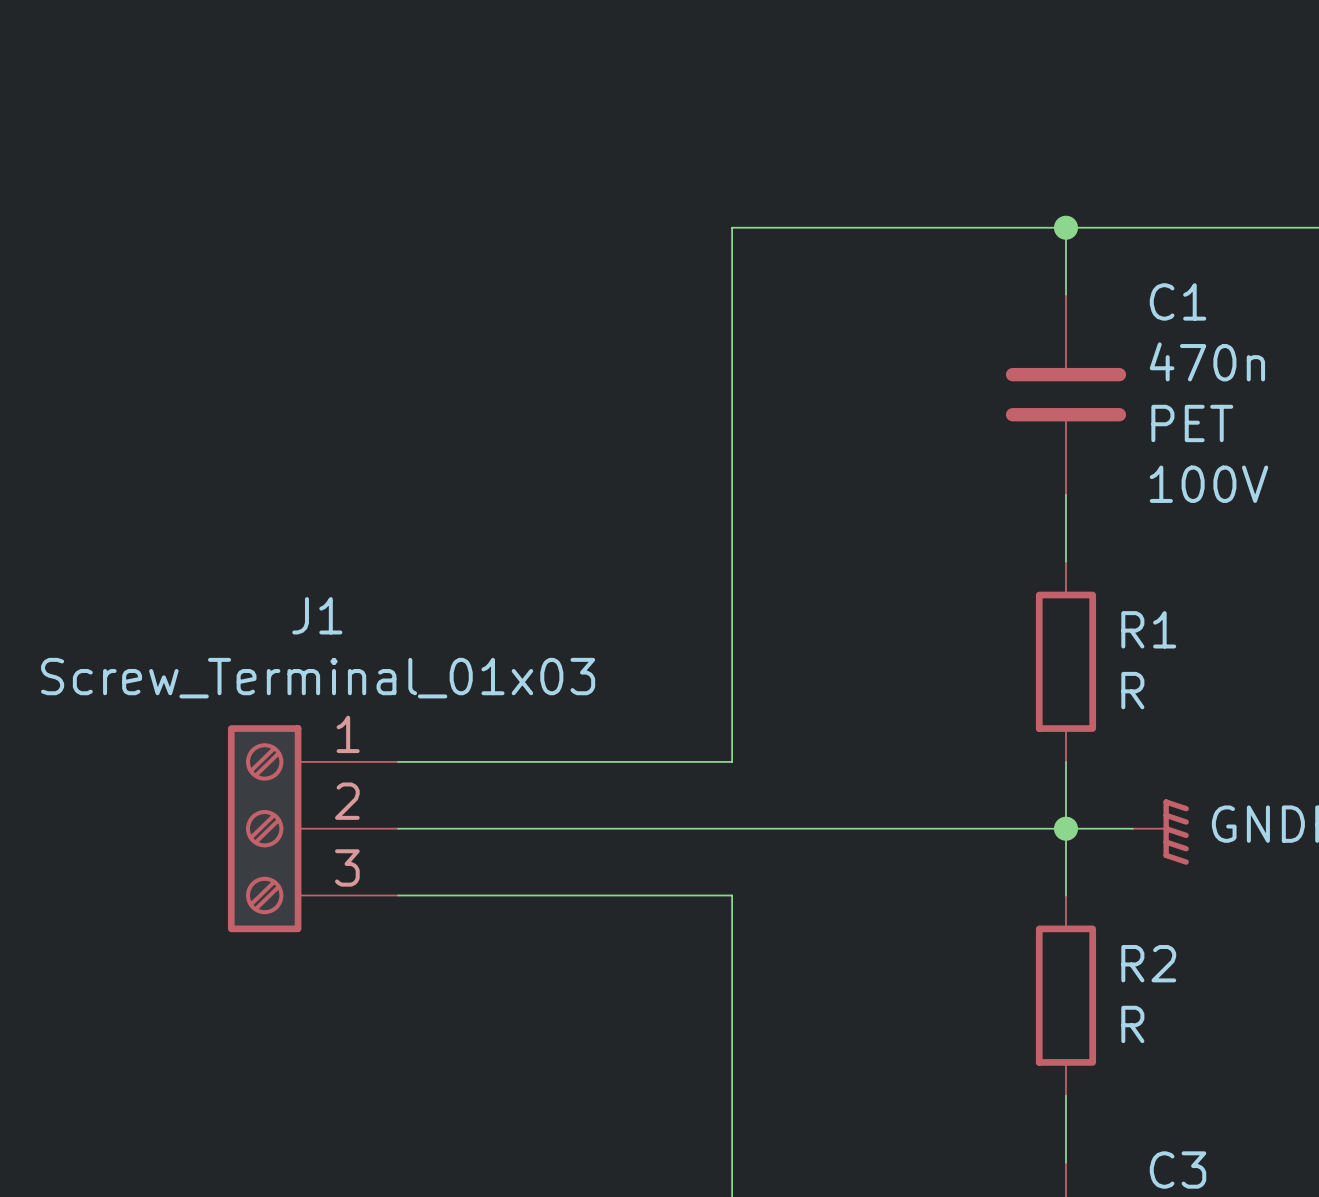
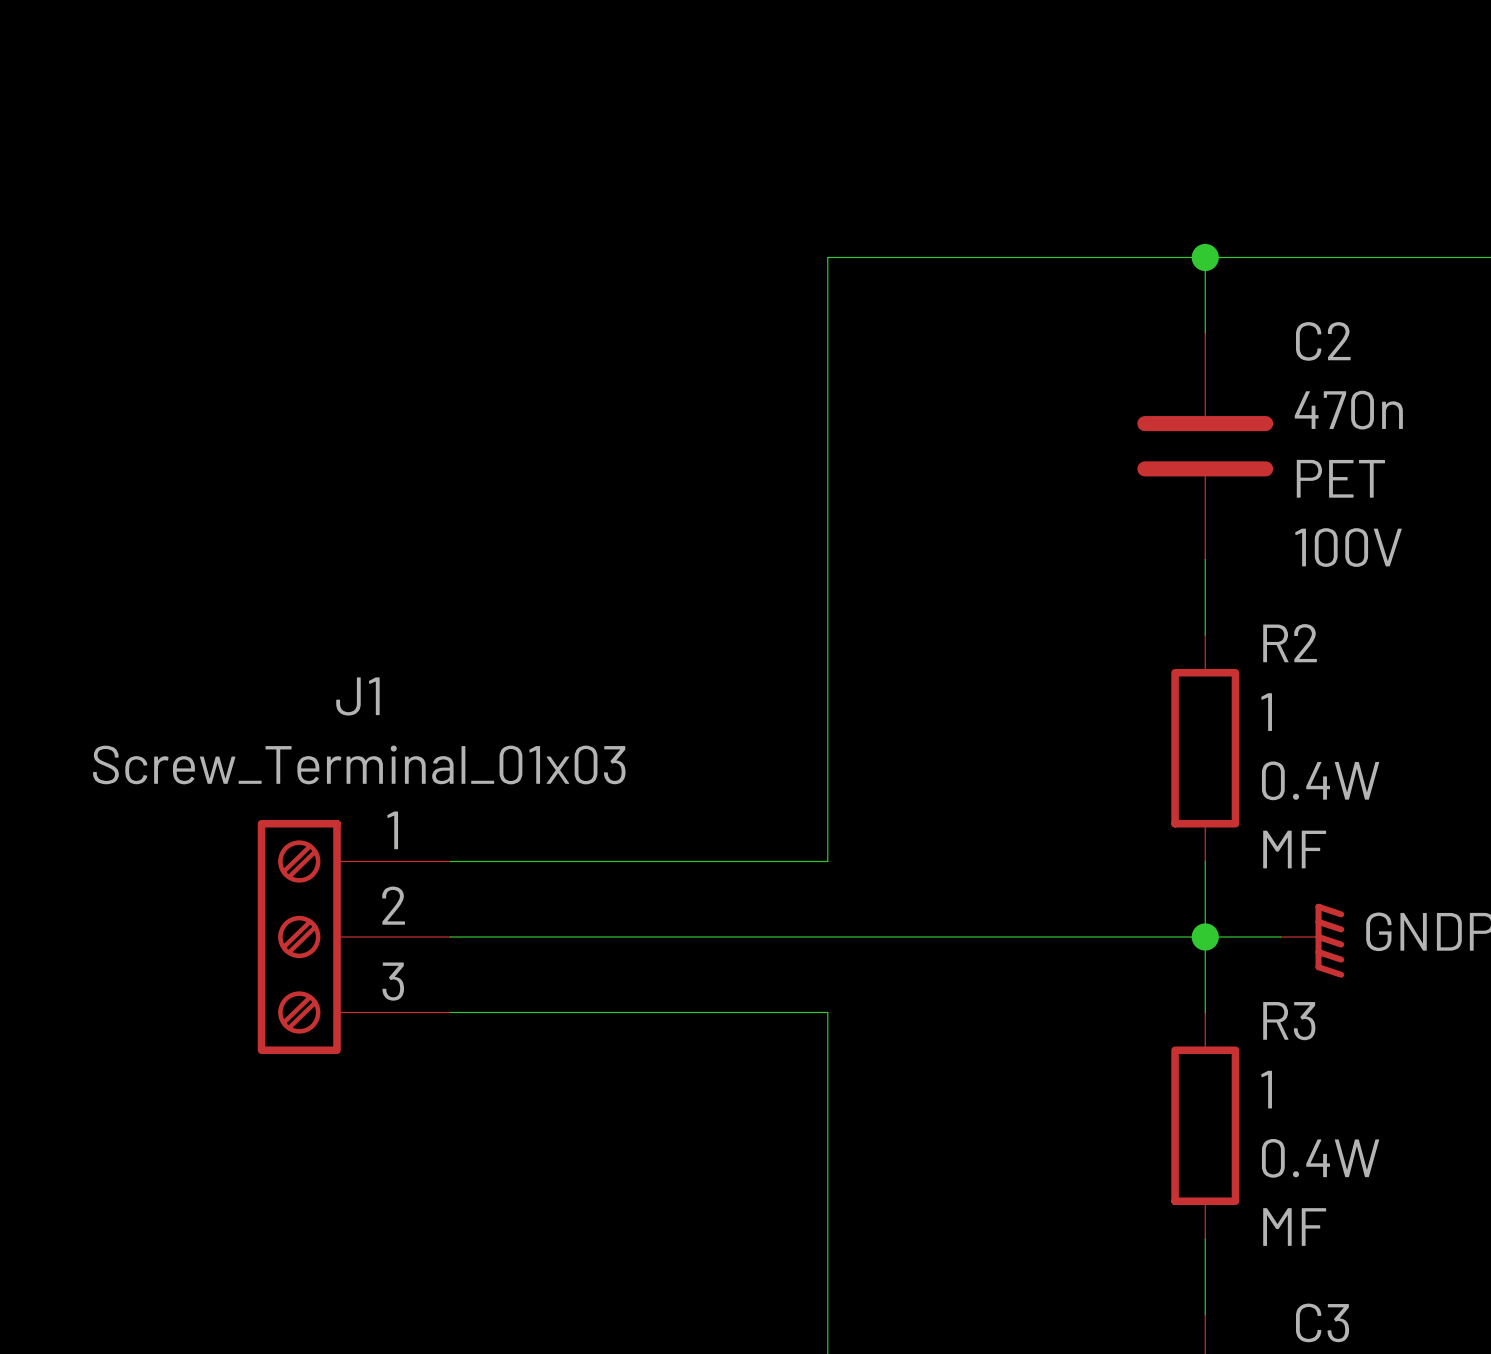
C1 name: C1 (1178, 301) -> C2 (1323, 341)
R1 name: R1 (1148, 629) -> R2 (1290, 643)
R1 text: none -> 0.4W (1320, 780)
R1 value: R (1132, 690) -> 1 (1266, 712)
R1 text: none -> MF (1294, 849)
R2 name: R2 (1148, 963) -> R3 (1289, 1021)
R2 text: none -> 0.4W (1320, 1158)
R2 value: R (1132, 1024) -> 1 (1266, 1089)
R2 text: none -> MF (1294, 1227)

